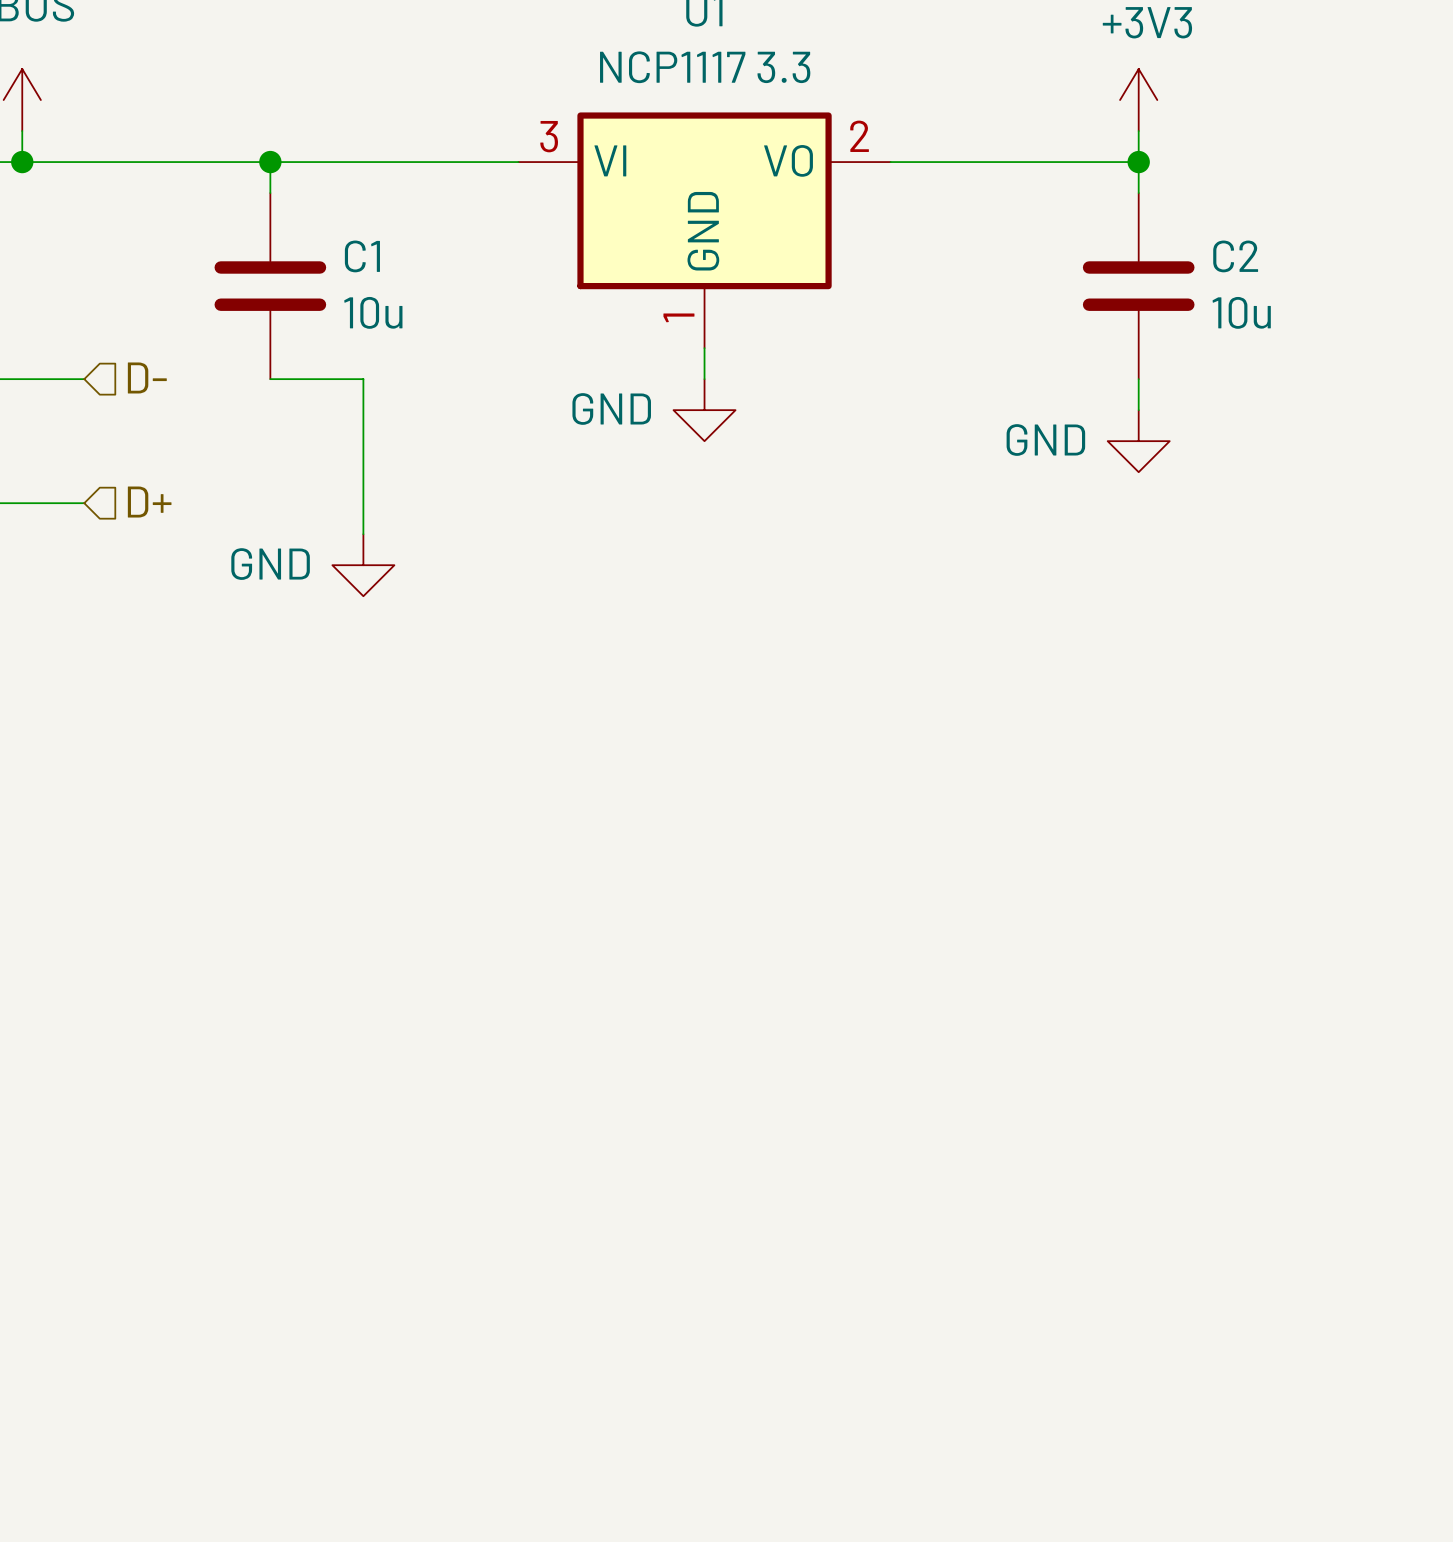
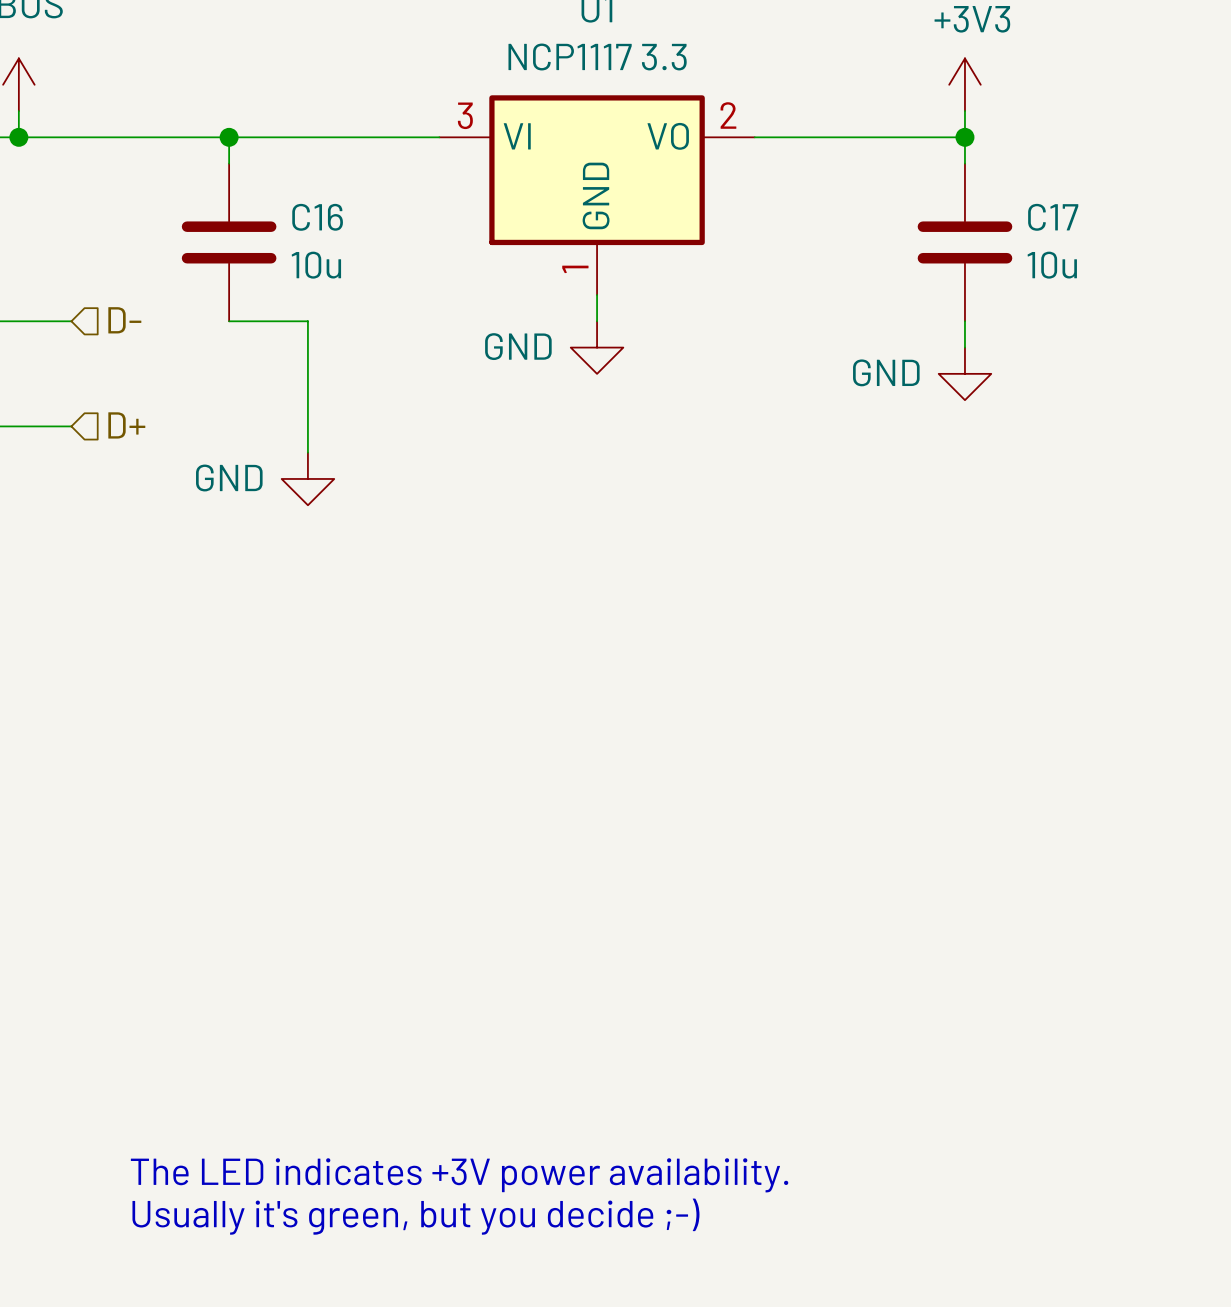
C1 name: C1 (362, 256) -> C16 (317, 217)
C2 name: C2 (1235, 256) -> C17 (1053, 217)
text: none -> The LED indicates +3V power availability. (459, 1175)
text: none -> Usually it's green, but you decide ;-) (415, 1216)

